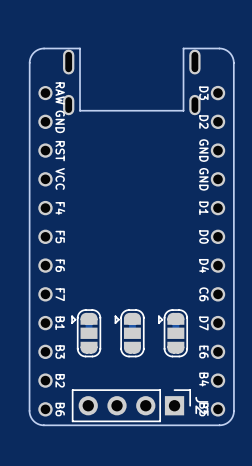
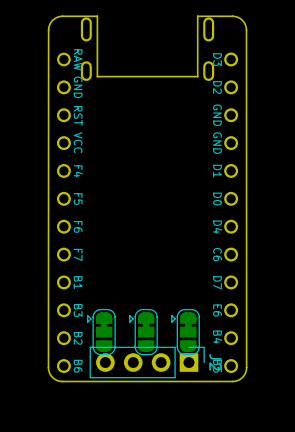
part: (86, 333) -> none
part: (129, 333) -> none
part: (173, 333) -> none
part: none -> (101, 332)
part: none -> (143, 332)
part: none -> (185, 332)

